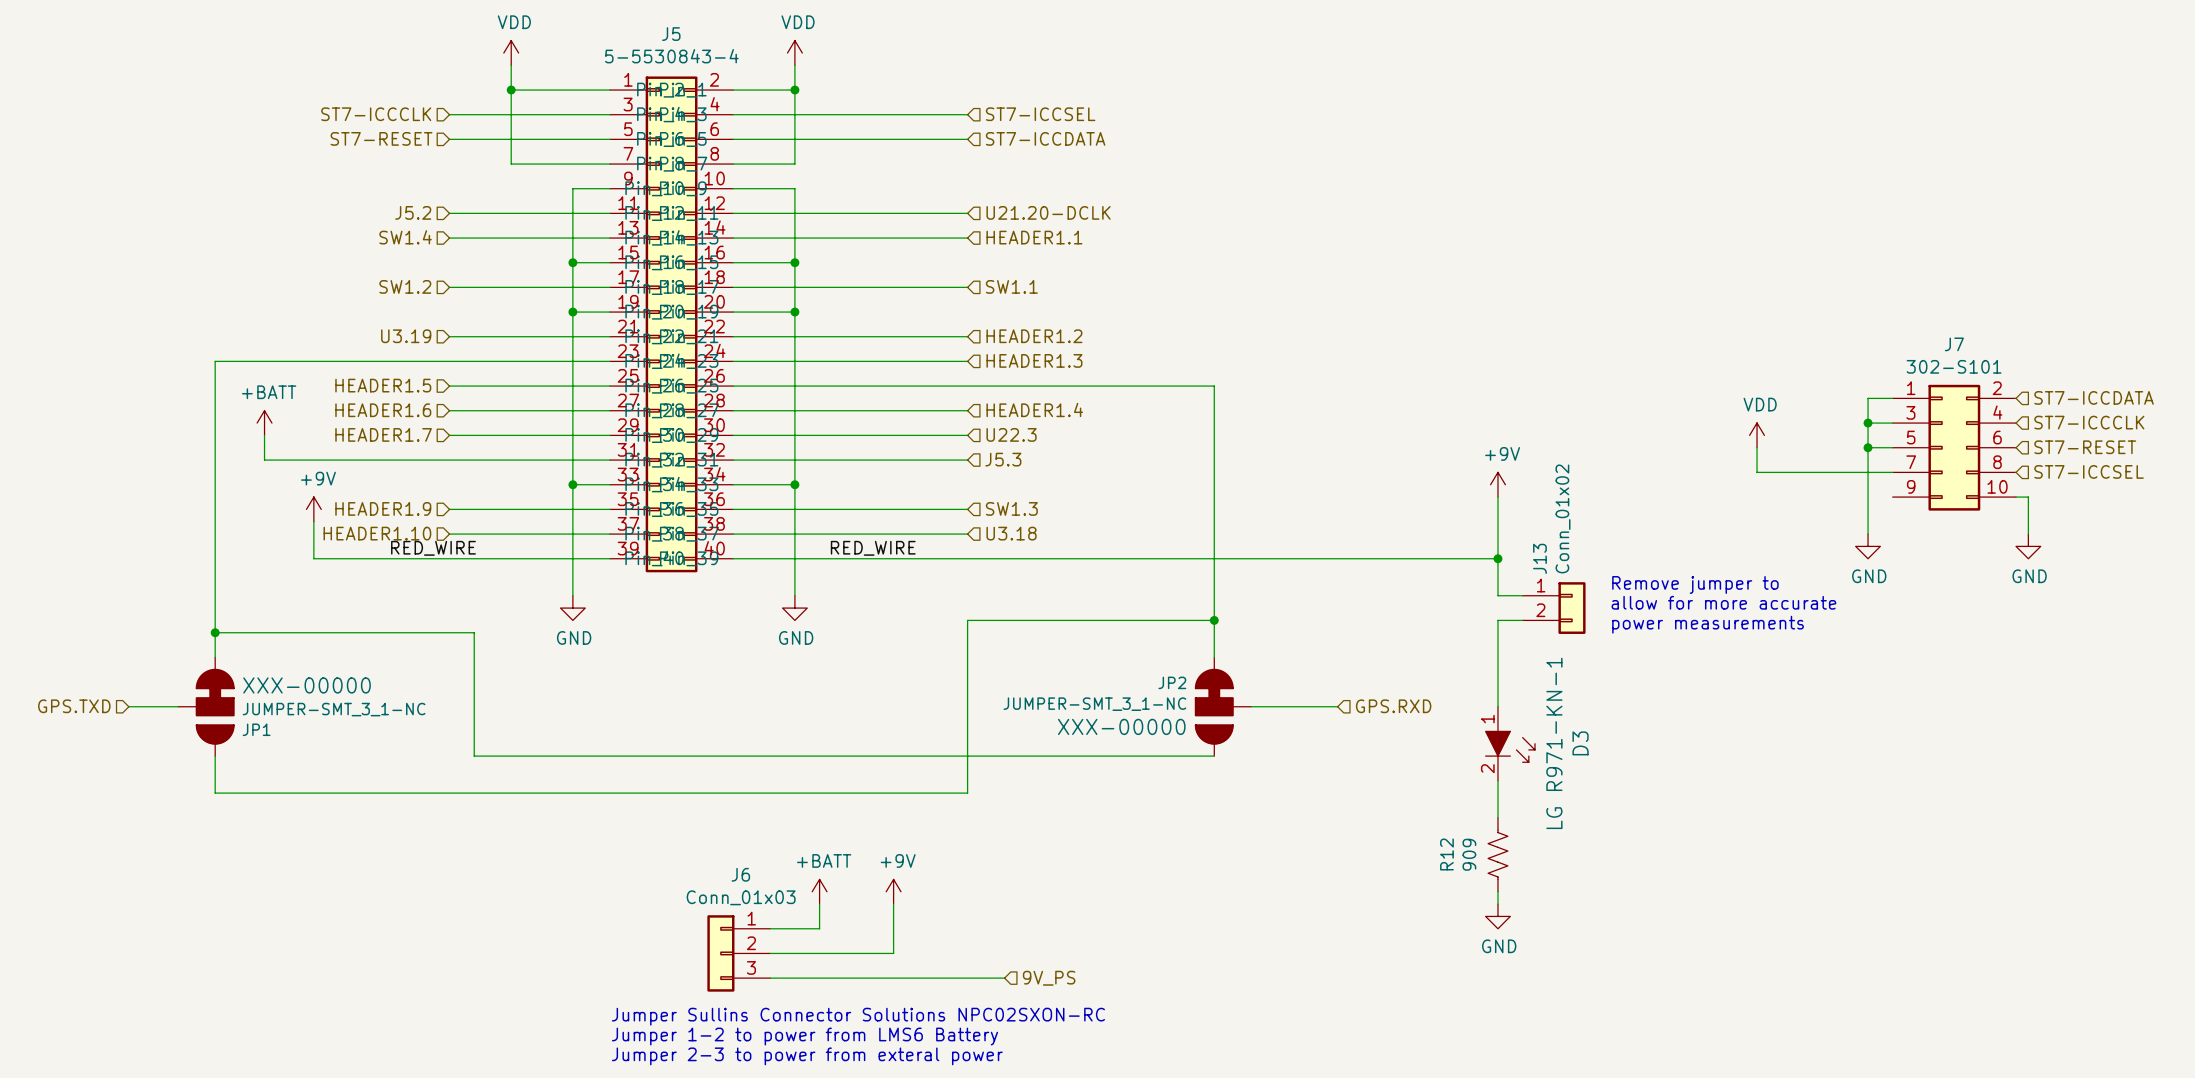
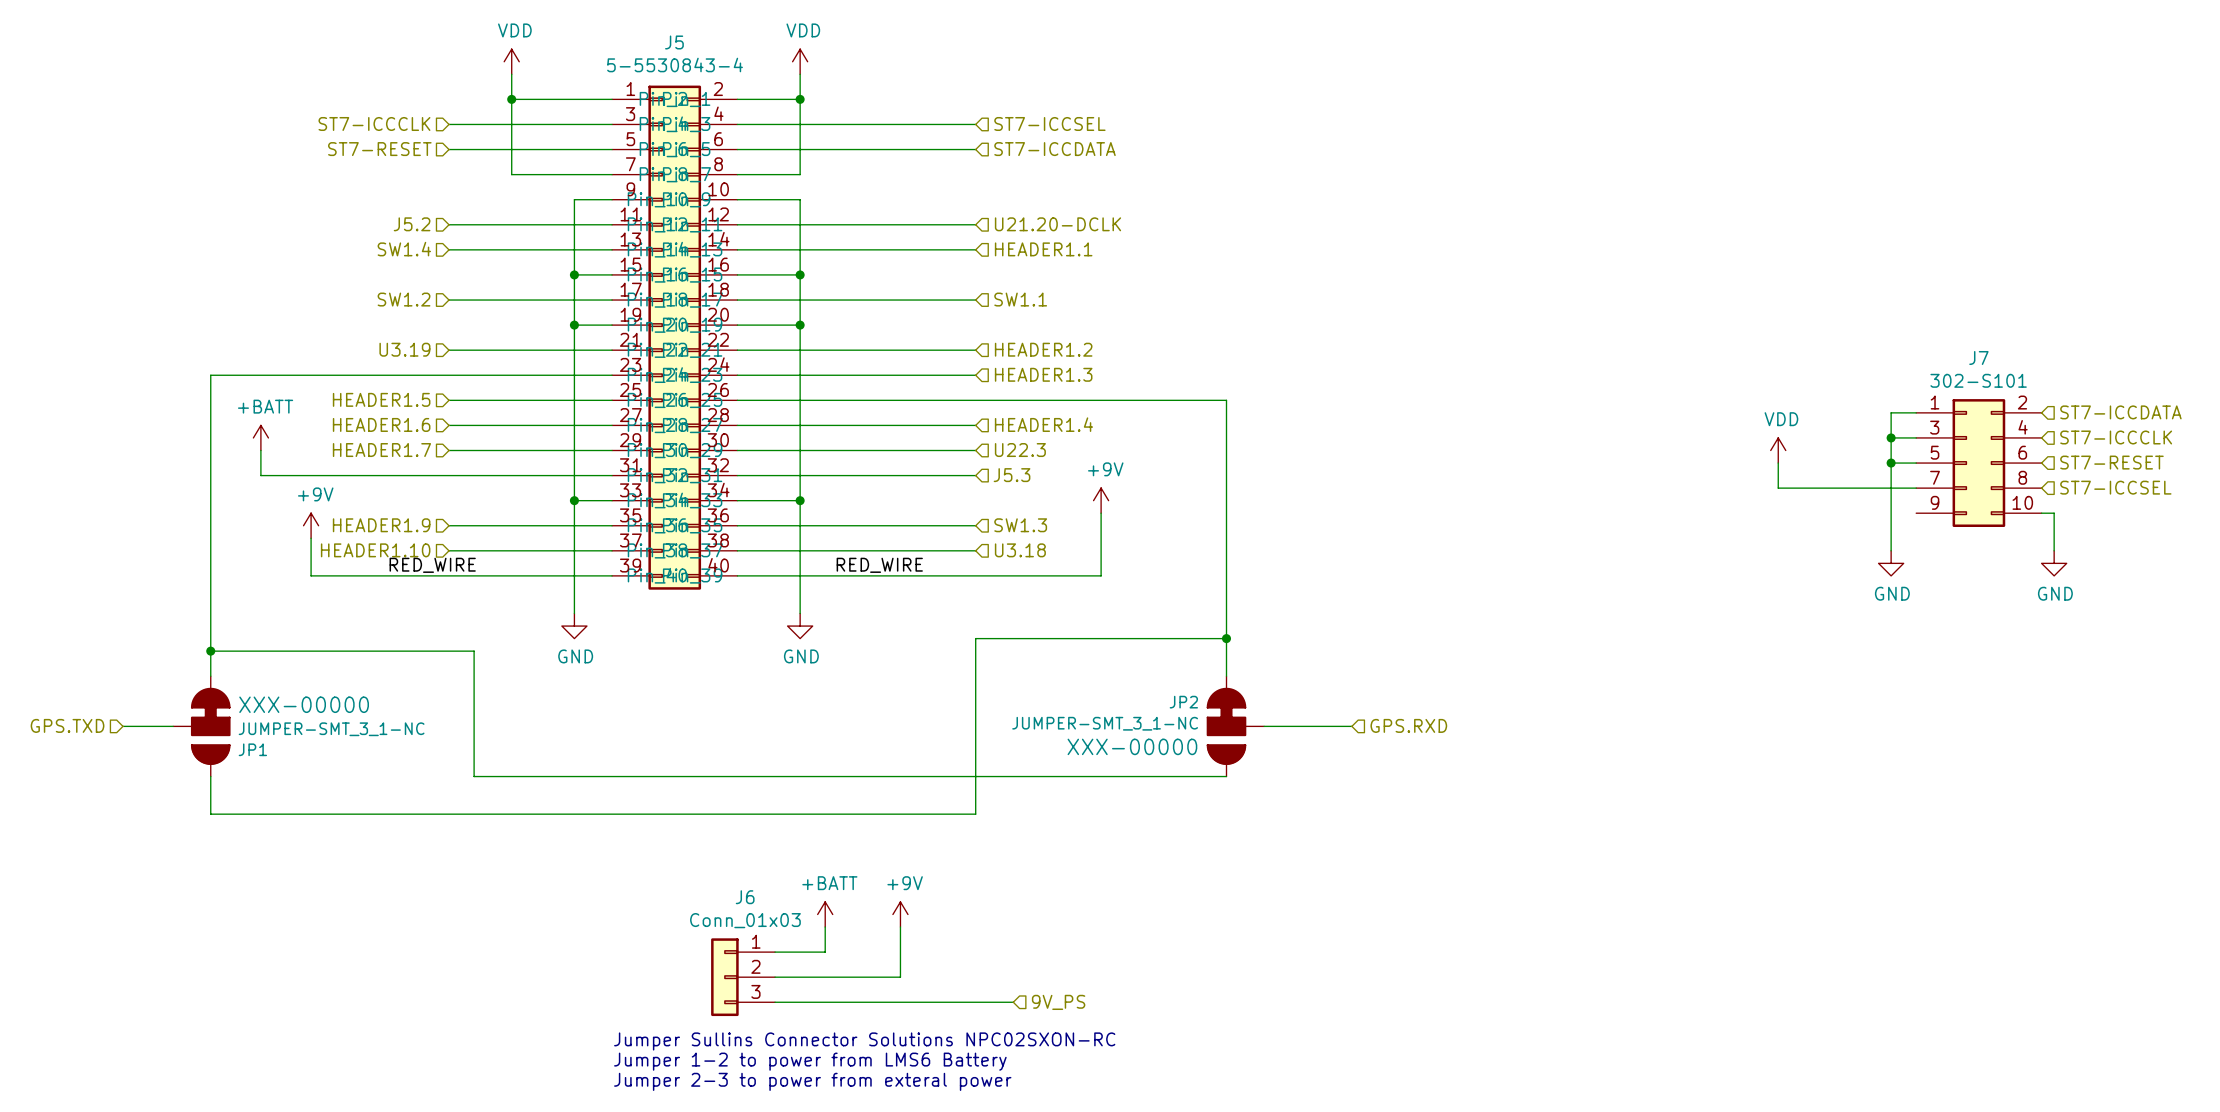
power symbol: none -> +9V (1101, 500)
power symbol: +9V (1497, 484) -> none
wire: (1497, 497) (1497, 595) (1522, 595) -> none
wire: (1090, 558) (1497, 558) -> (1101, 575) (1101, 513)
junction: (1497, 558) -> none
text: Remove jumper to (1695, 584) -> none
text: allow for more accurate (1723, 602) -> none
J13: Conn_01x02 (1554, 608) -> none
wire: (1522, 620) (1497, 620) (1497, 706) -> none
text: power measurements (1708, 624) -> none
D3: LG R971-KN-1 (1510, 743) -> none
wire: (1497, 780) (1497, 817) -> none
R12: 909 (1497, 854) -> none
wire: (1497, 891) (1497, 904) -> none
power symbol: GND (1497, 916) -> none

